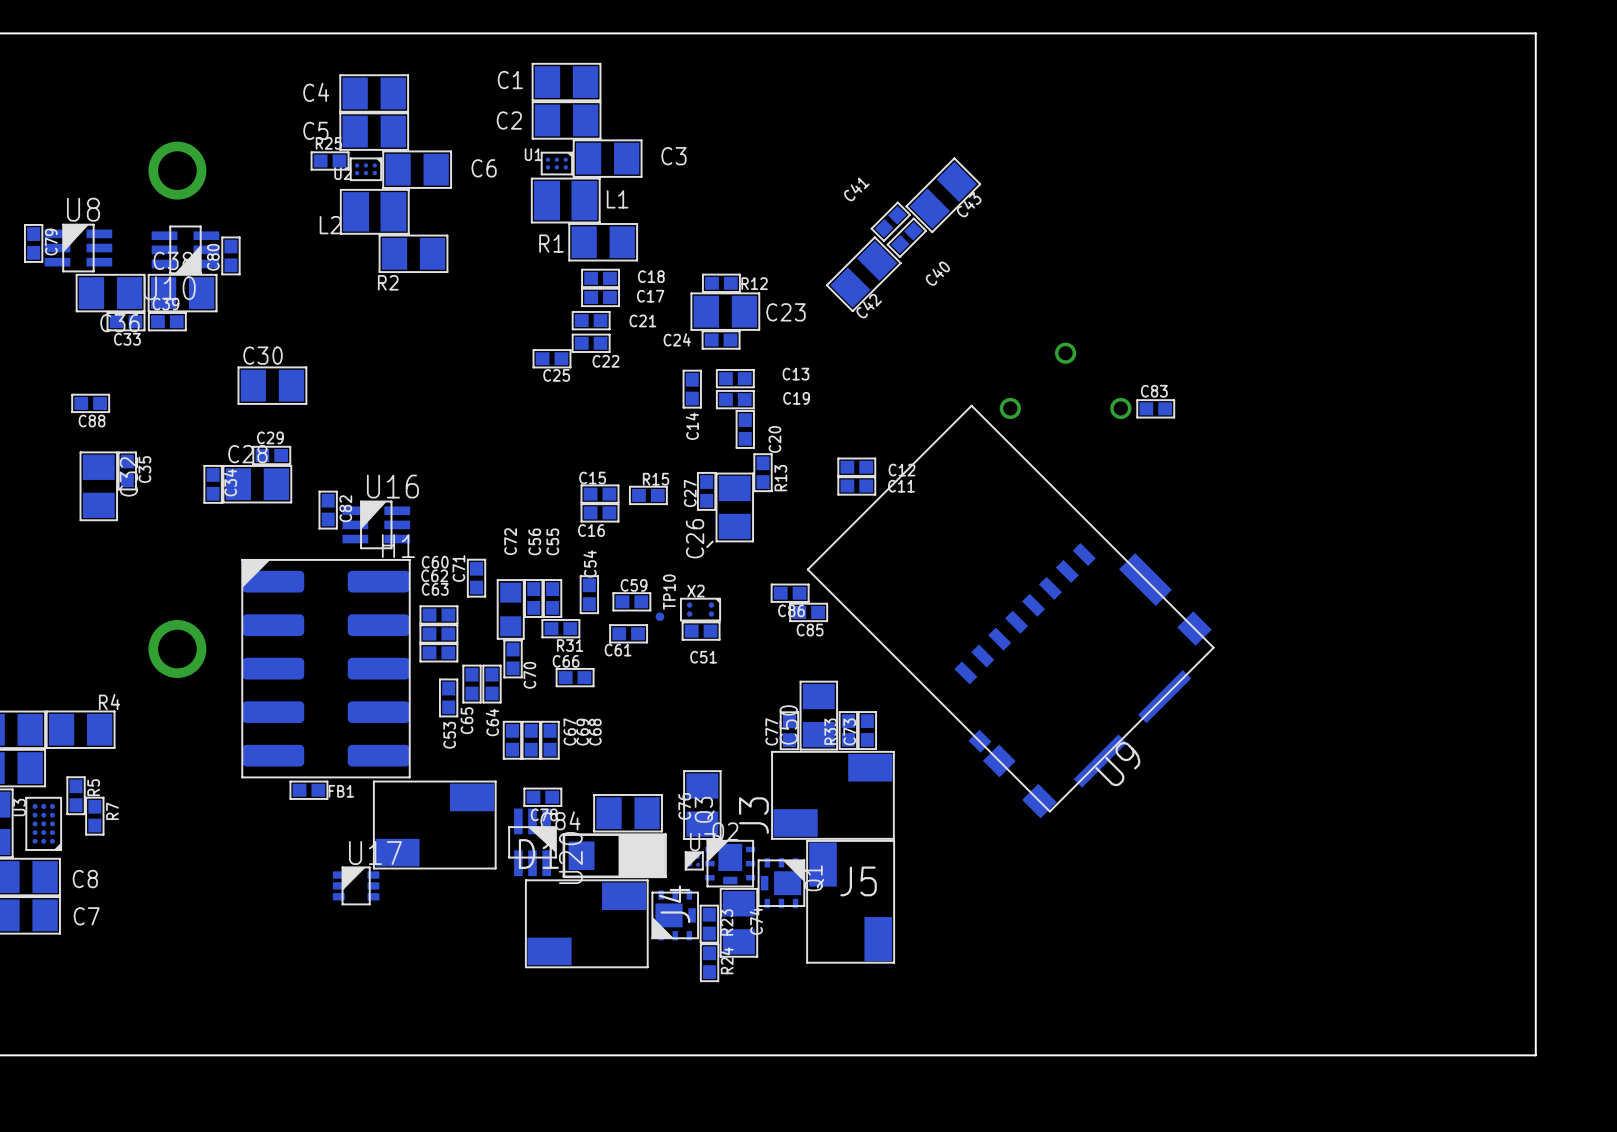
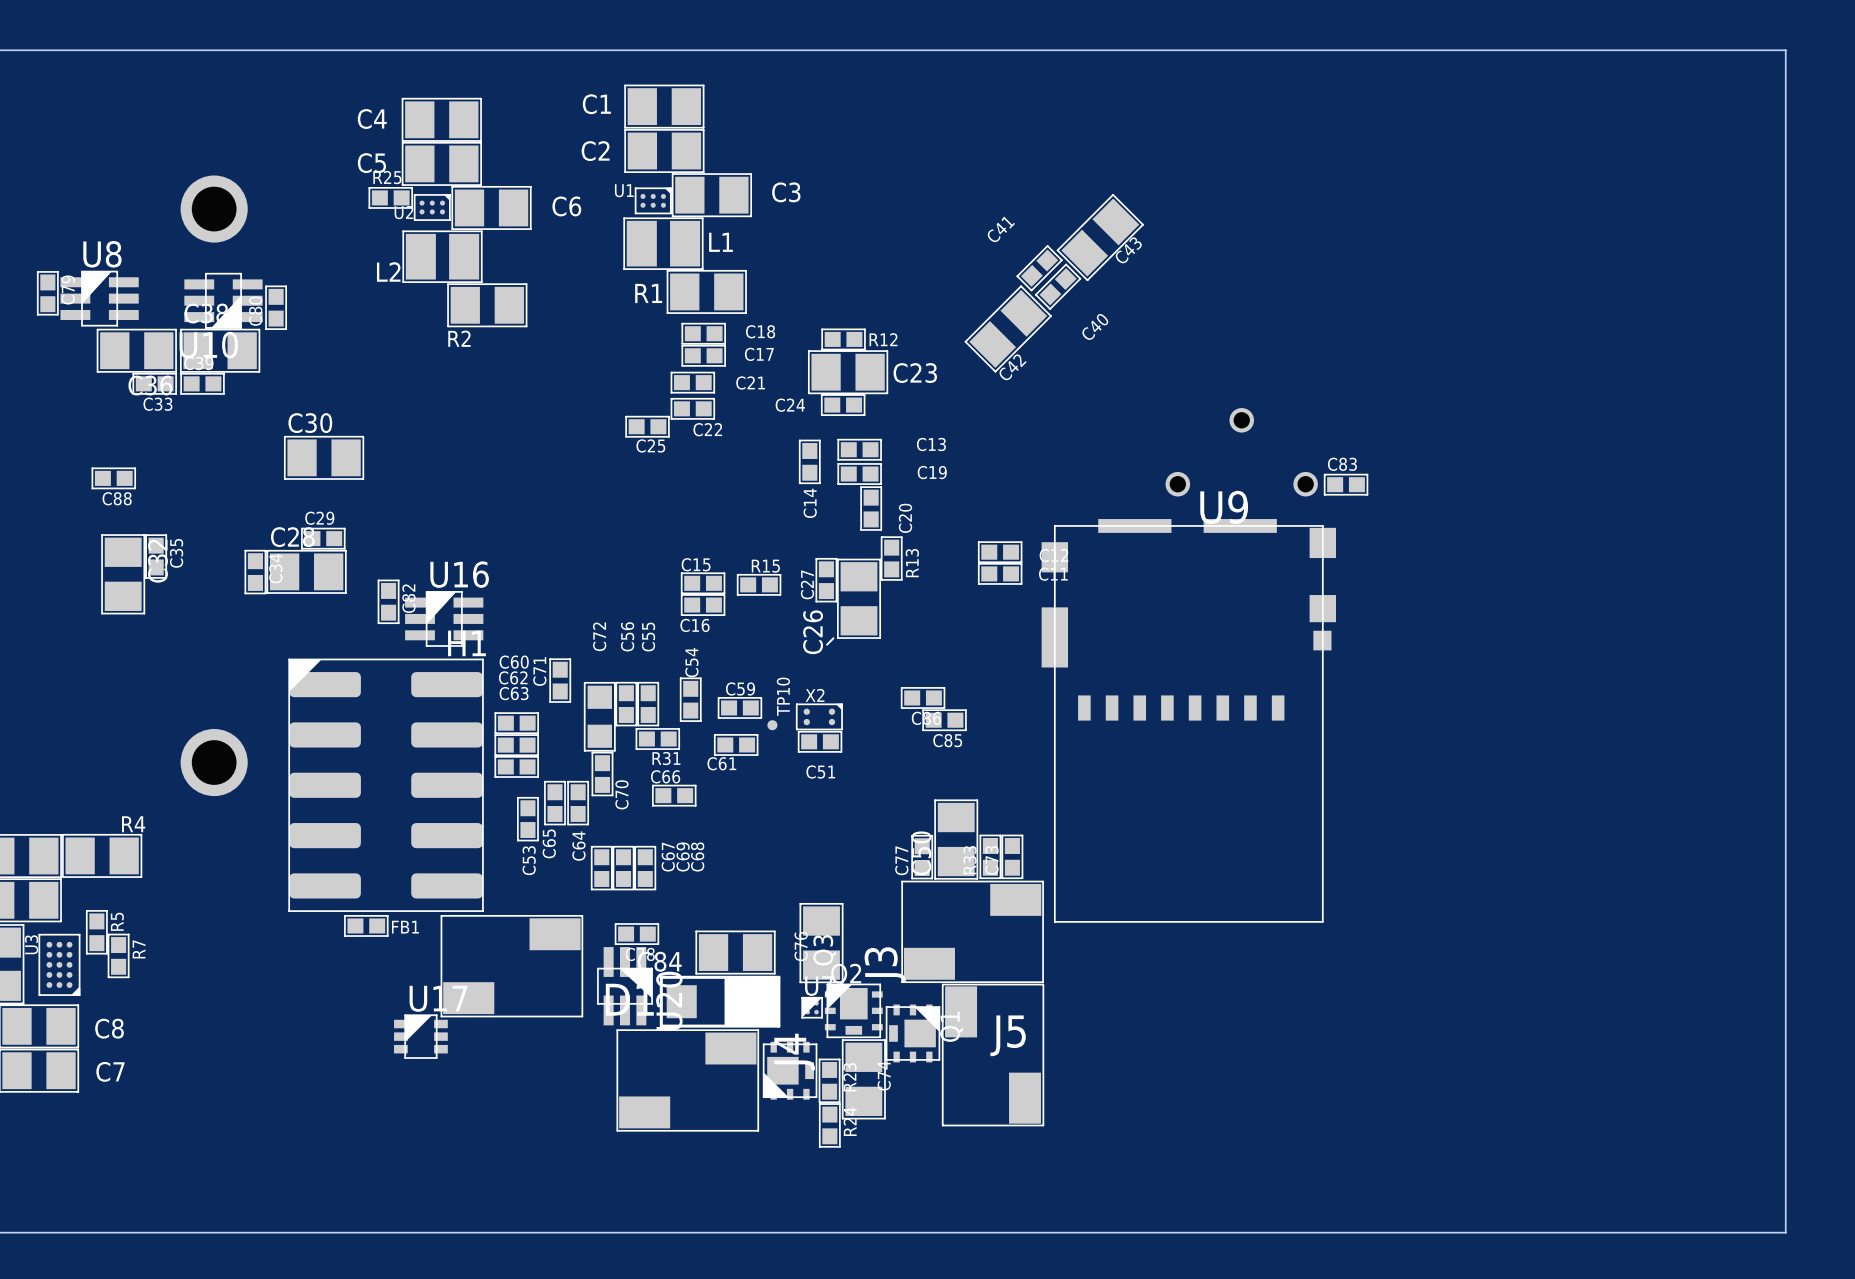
U9 rotation: 0° (1010, 611) -> 135° counterclockwise (1188, 720)

